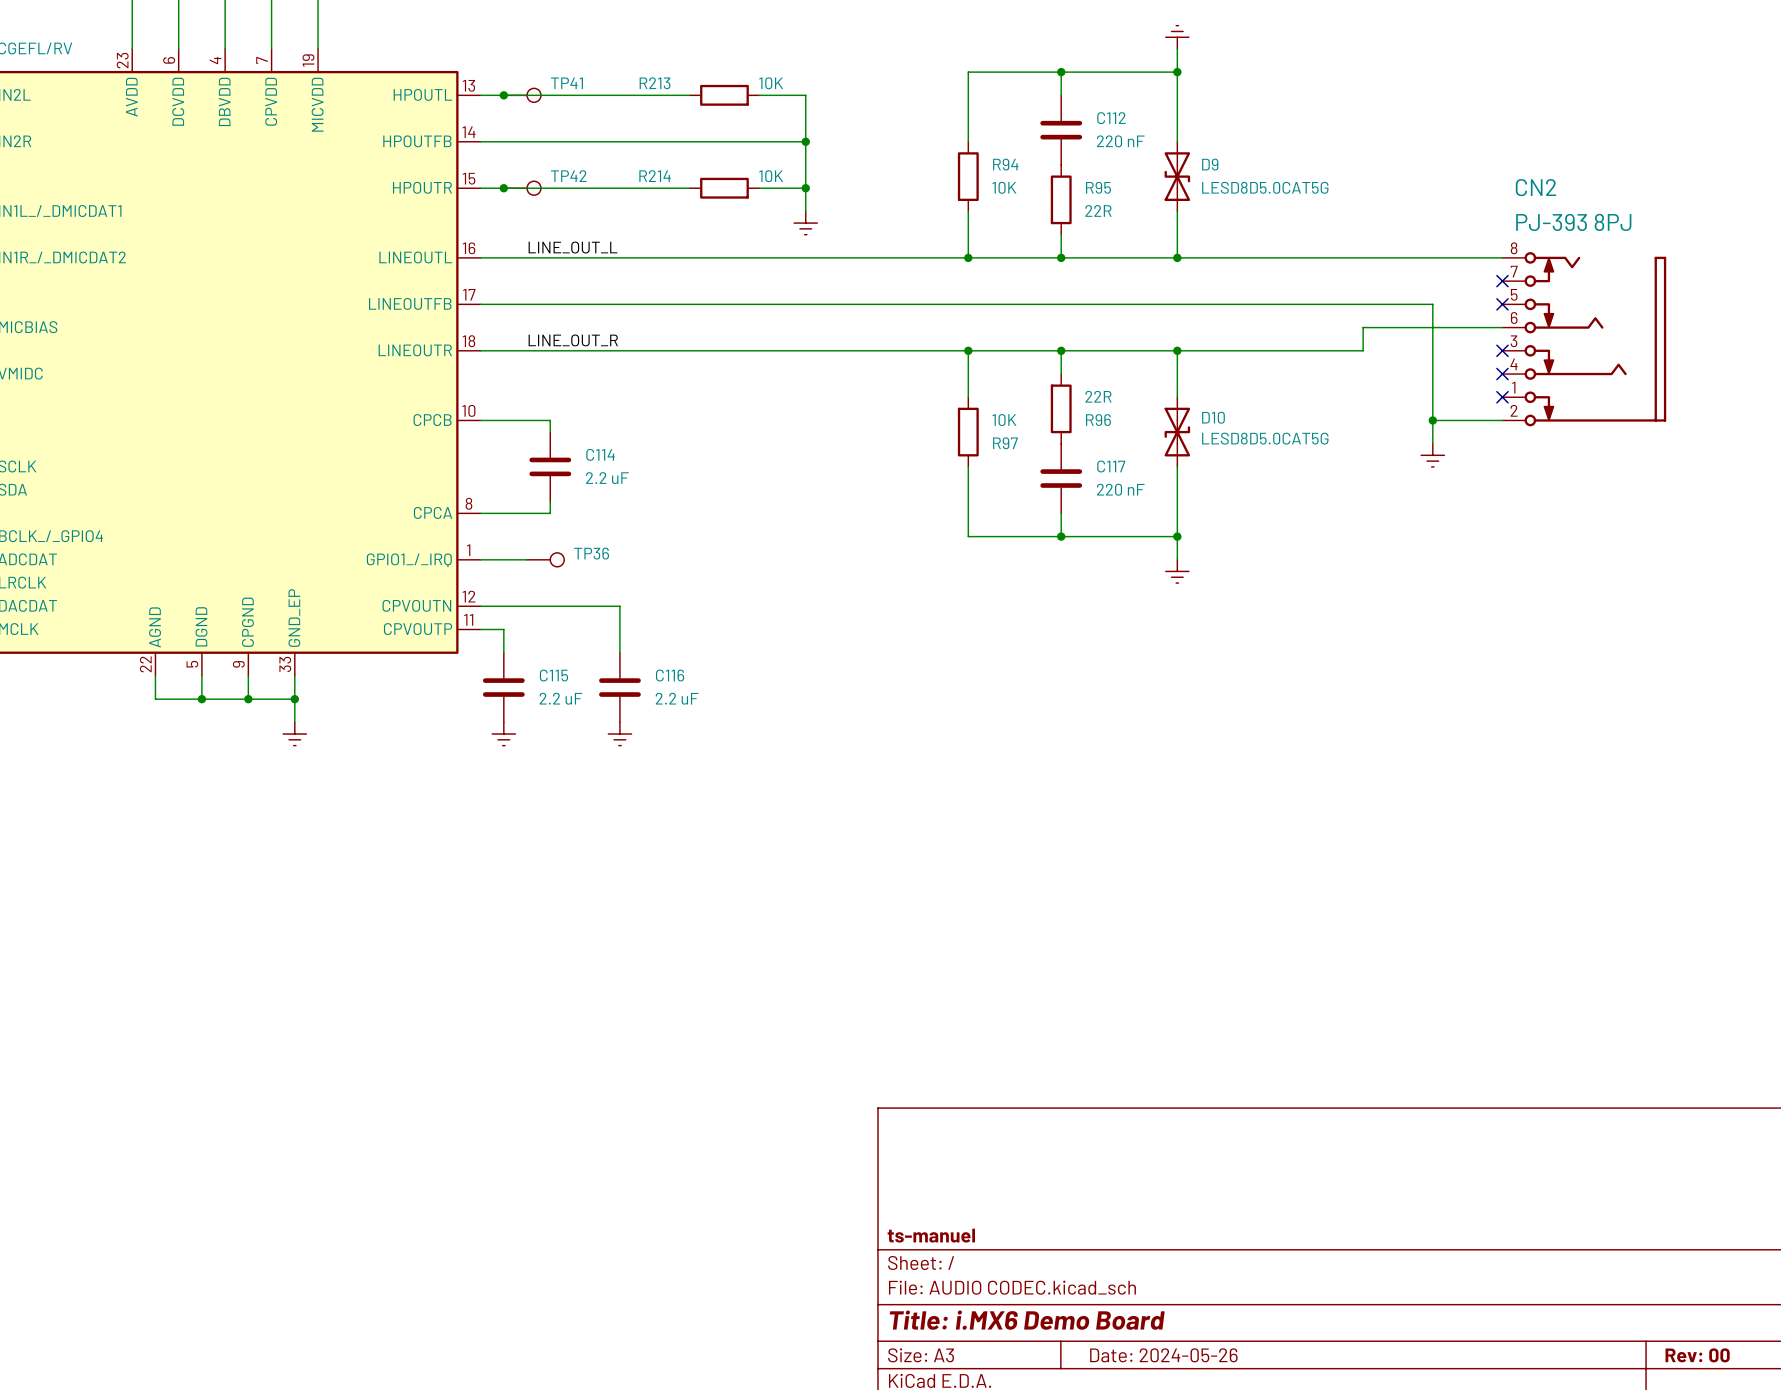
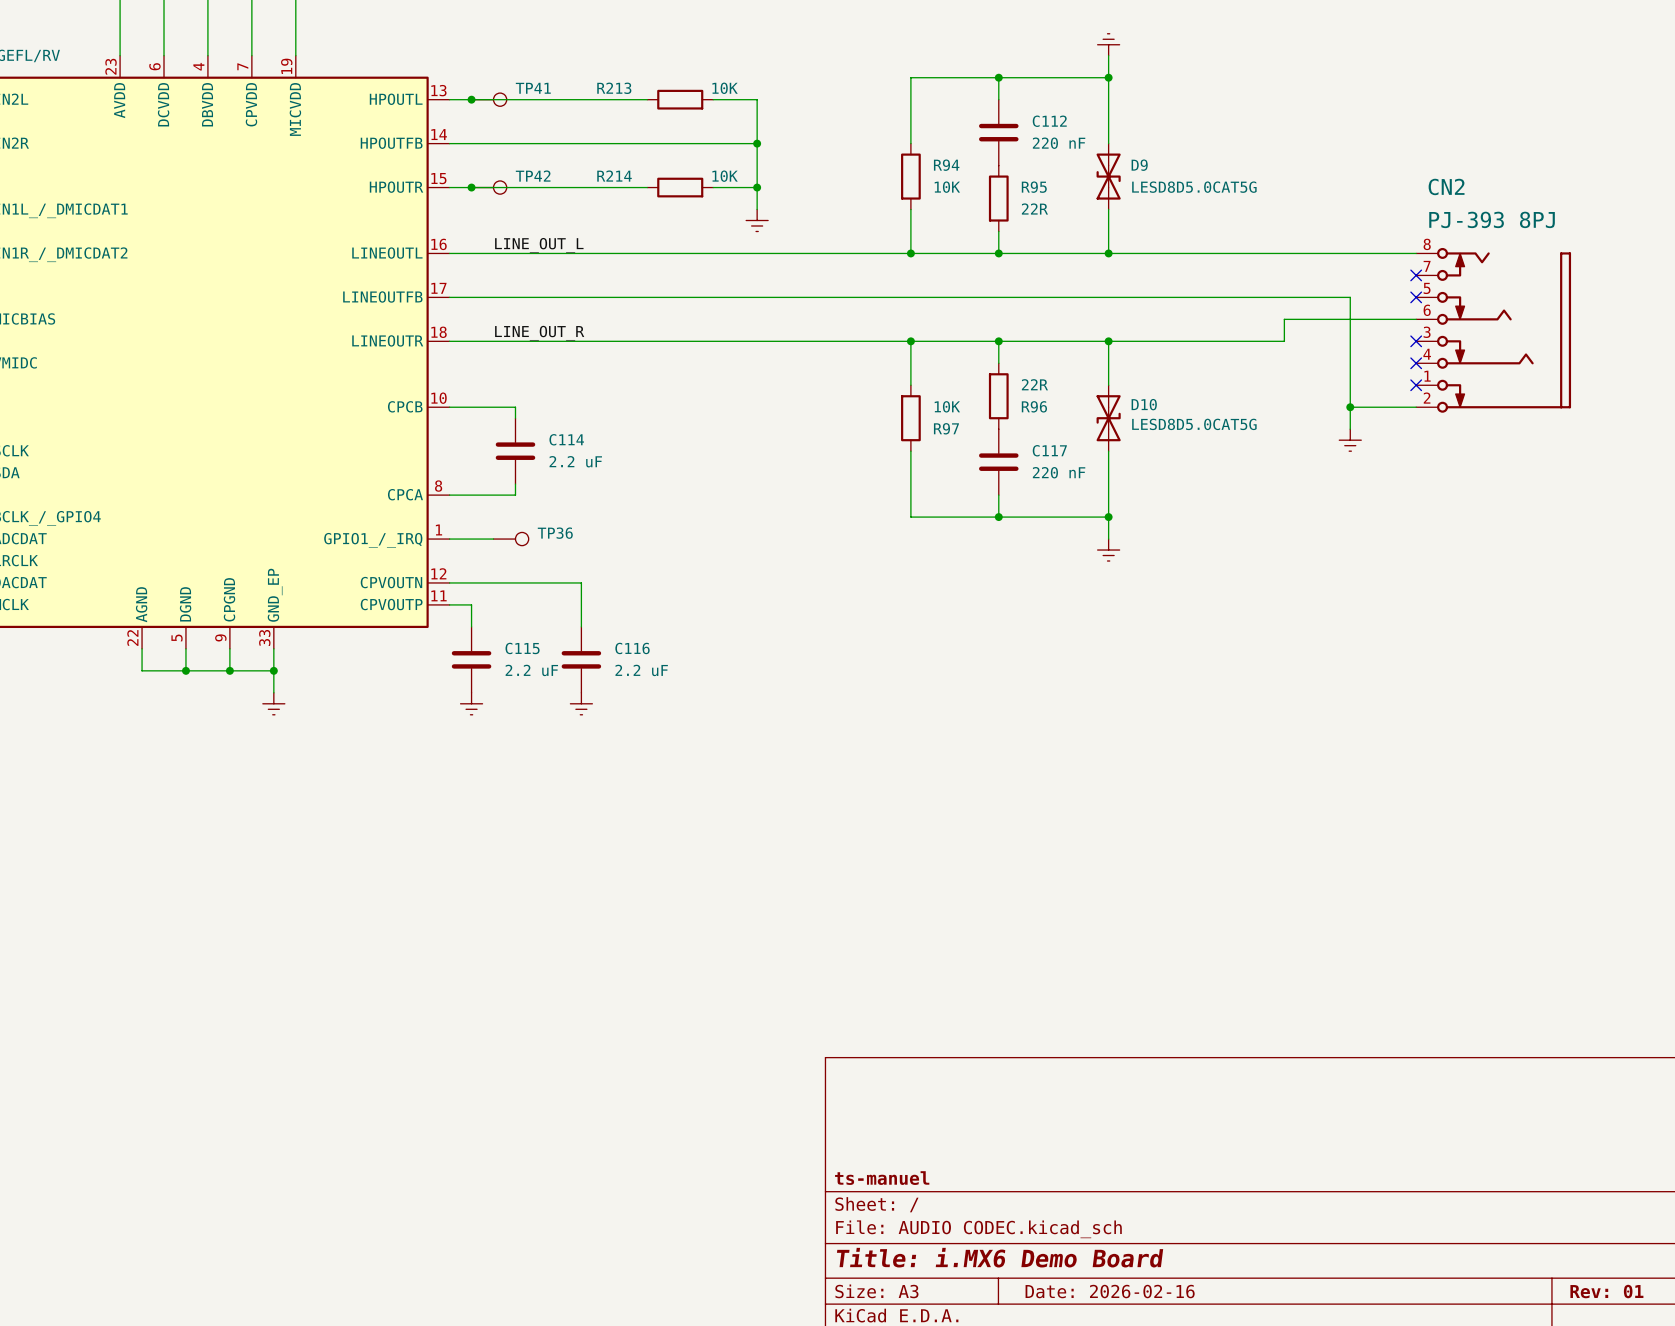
title block: Date: 2024-05-26 (1163, 1355) -> Date: 2026-02-16 (1110, 1291)
title block: Rev: 00 (1697, 1355) -> Rev: 01 (1606, 1291)

